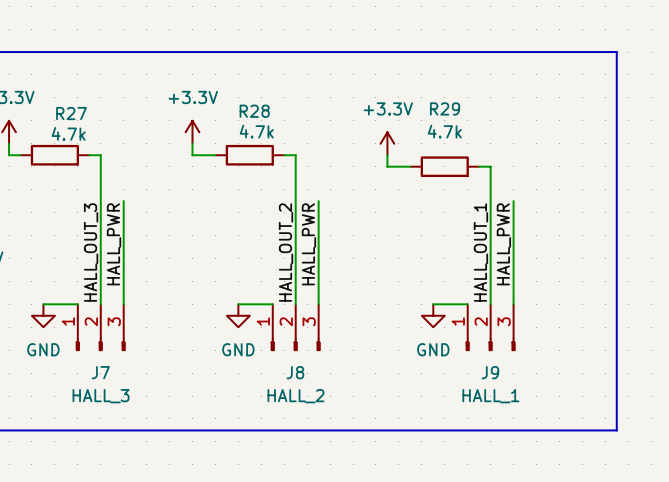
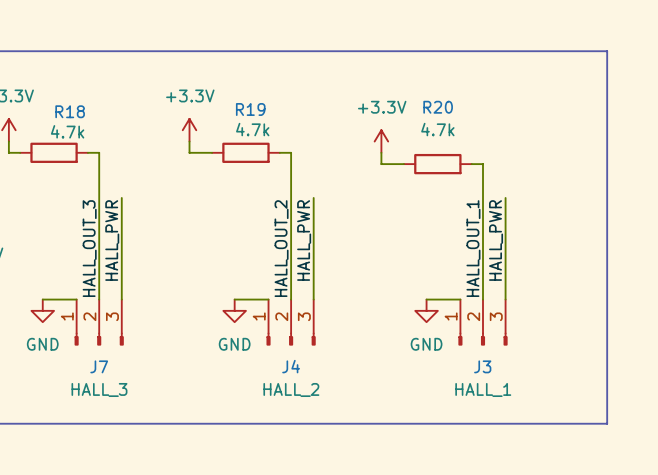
R29 name: R29 (445, 108) -> R20 (438, 107)
R28 name: R28 (254, 111) -> R19 (250, 109)
R27 name: R27 (71, 113) -> R18 (70, 111)
J8 name: J8 (295, 372) -> J4 (291, 366)
J9 name: J9 (490, 372) -> J3 (482, 366)

